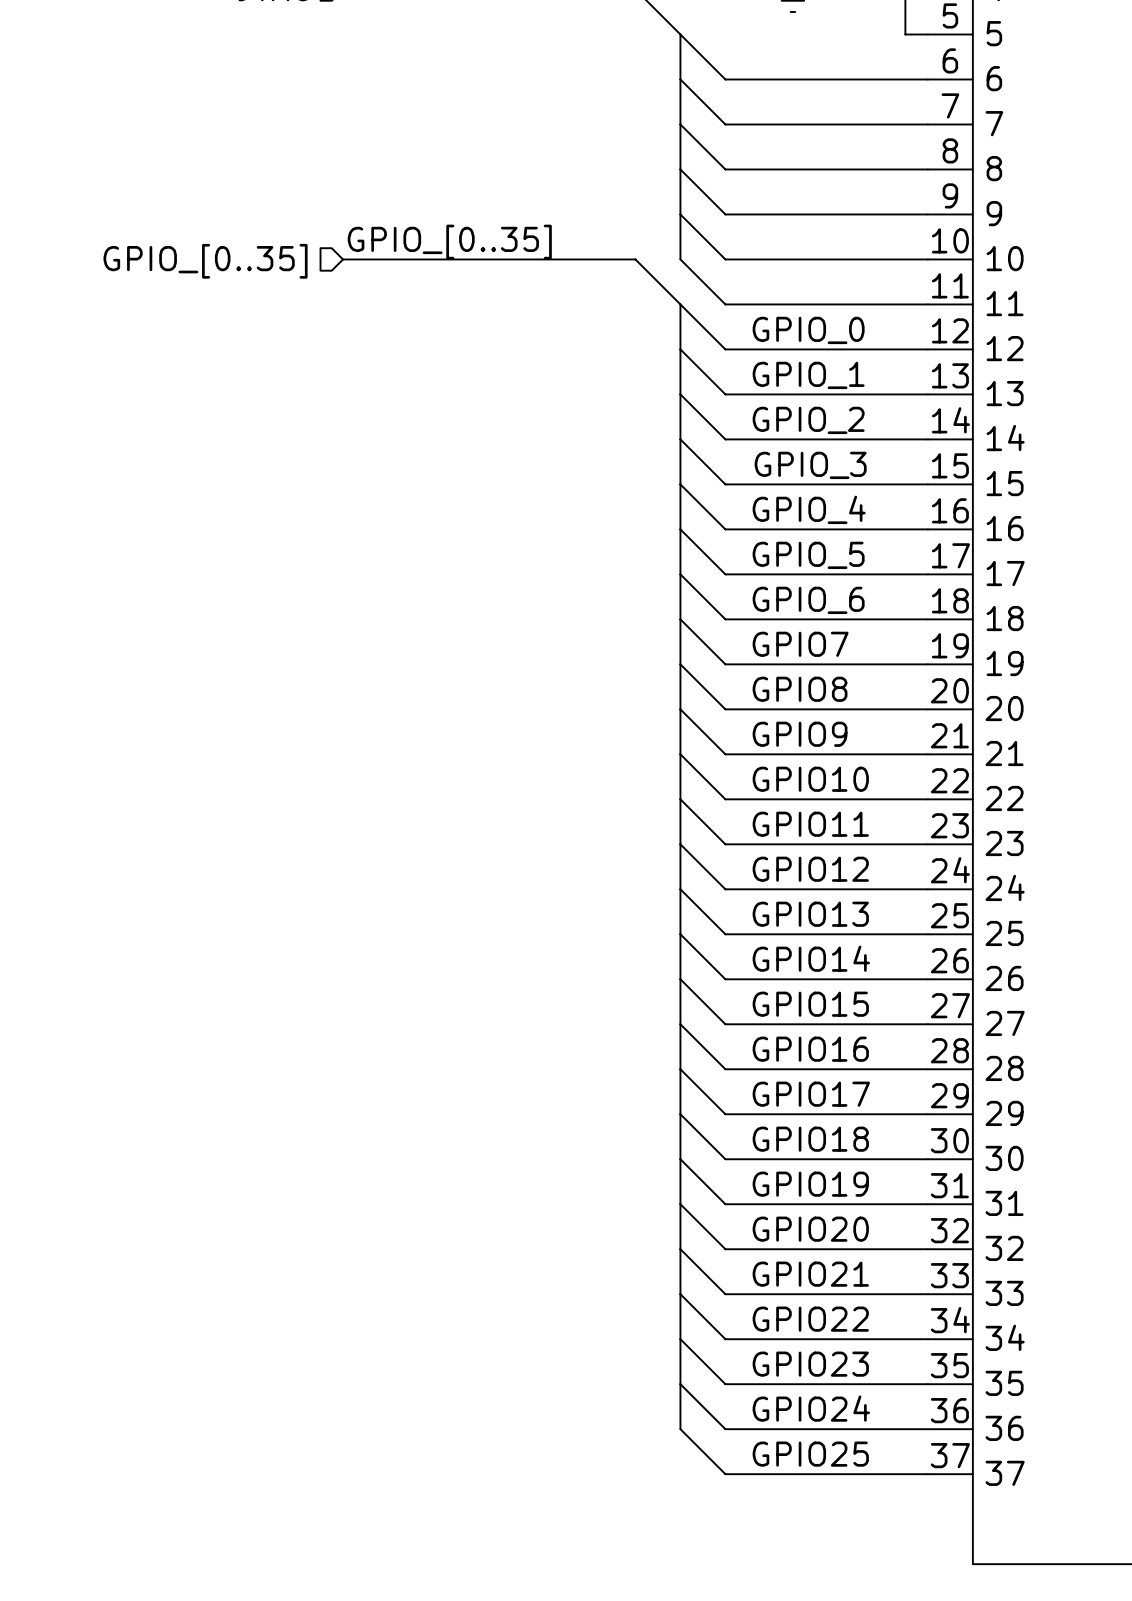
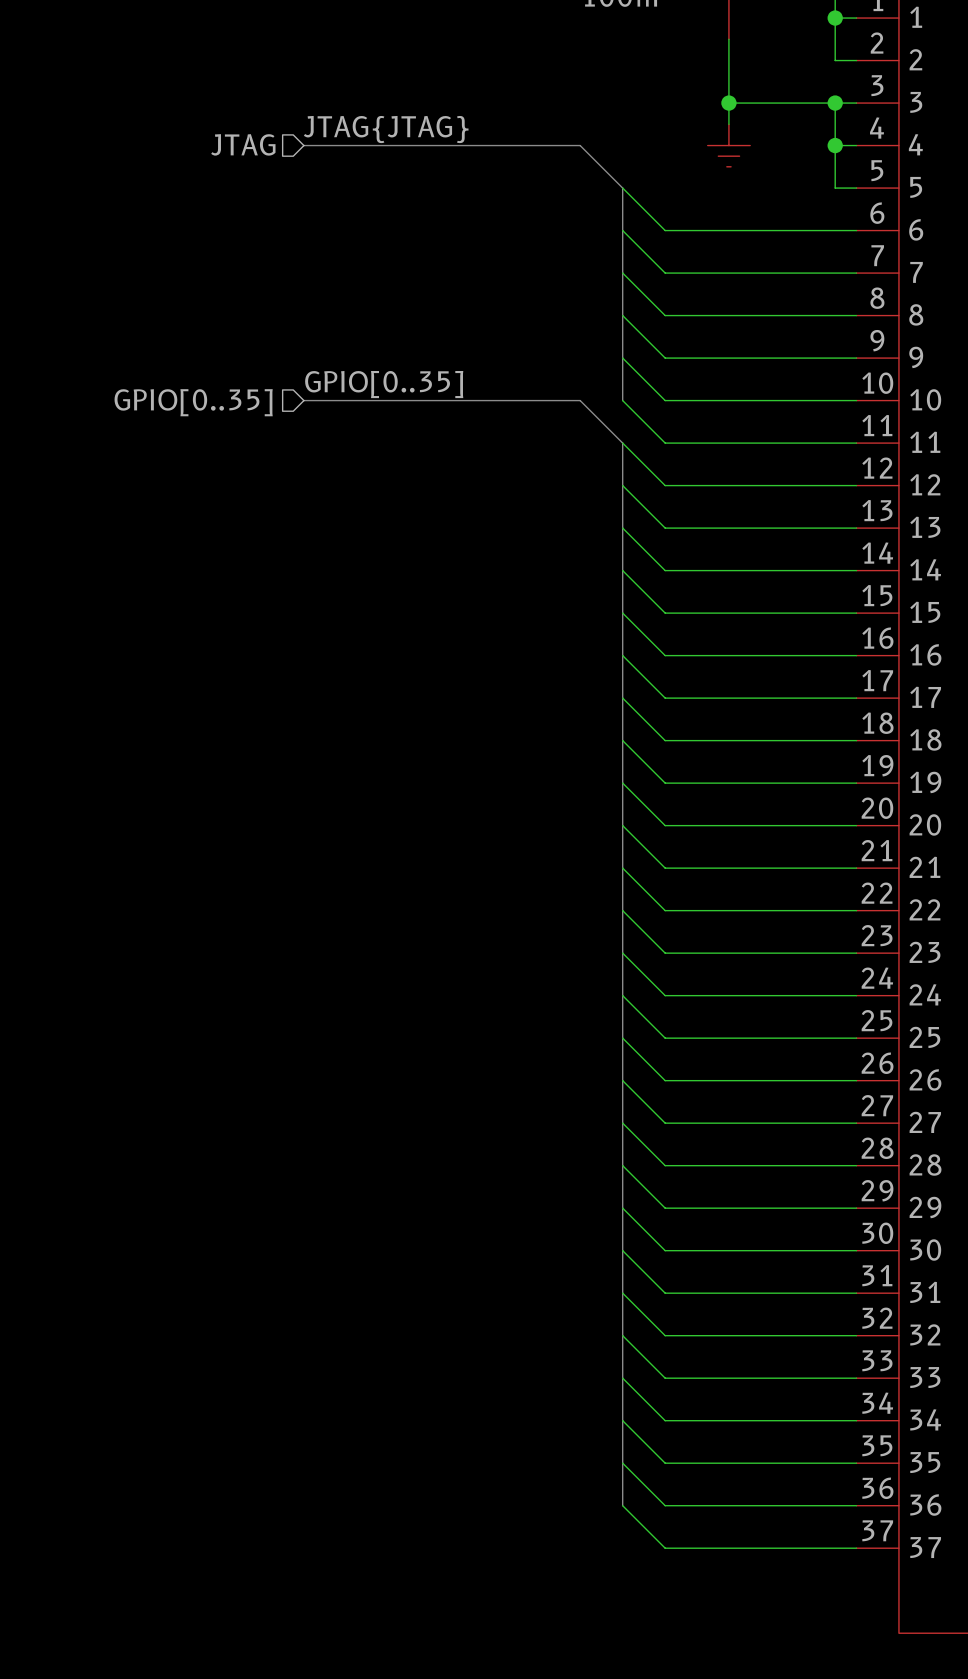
label: GPIO_[0..35] (449, 242) -> GPIO[0..35] (384, 384)
hierarchical label: GPIO_[0..35] (205, 261) -> GPIO[0..35] (193, 402)
label: GPIO_0 (808, 330) -> none
label: GPIO_1 (808, 375) -> none
label: GPIO_2 (808, 420) -> none
label: GPIO_3 (810, 465) -> none
label: GPIO_4 (809, 509) -> none
label: GPIO_5 (808, 555) -> none
label: GPIO_6 (808, 600) -> none
label: GPIO7 (800, 644) -> none
label: GPIO8 (800, 689) -> none
label: GPIO9 (800, 734) -> none
label: GPIO10 (810, 779) -> none
label: GPIO11 (810, 824) -> none
label: GPIO12 (810, 869) -> none
label: GPIO13 (810, 914) -> none
label: GPIO14 (811, 958) -> none
label: GPIO15 (810, 1004) -> none
label: GPIO16 (810, 1049) -> none
label: GPIO17 (811, 1094) -> none
label: GPIO18 (810, 1139) -> none
label: GPIO19 (810, 1184) -> none
label: GPIO20 (810, 1229) -> none
label: GPIO21 (810, 1274) -> none
label: GPIO22 (810, 1319) -> none
label: GPIO23 (810, 1364) -> none
label: GPIO24 (811, 1408) -> none
label: GPIO25 (810, 1454) -> none

